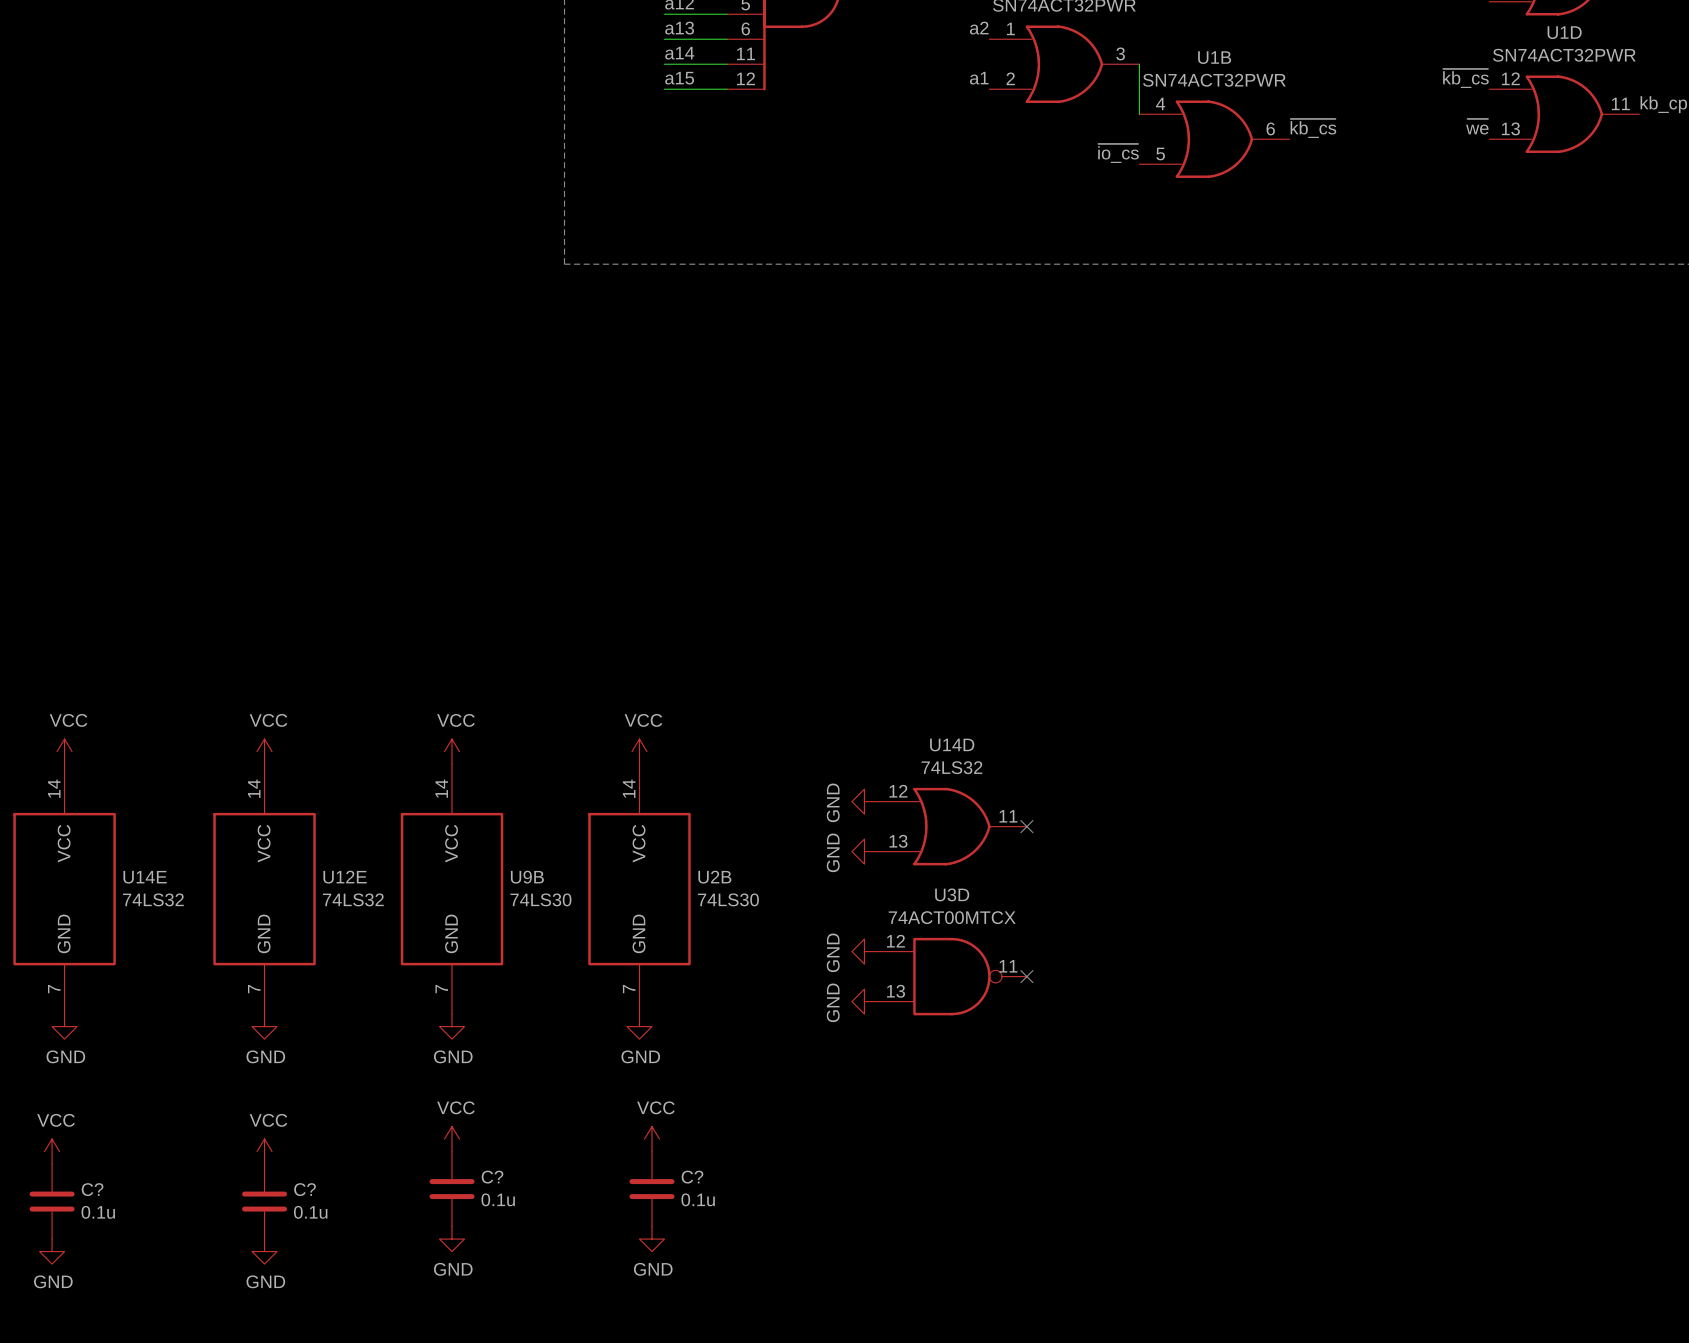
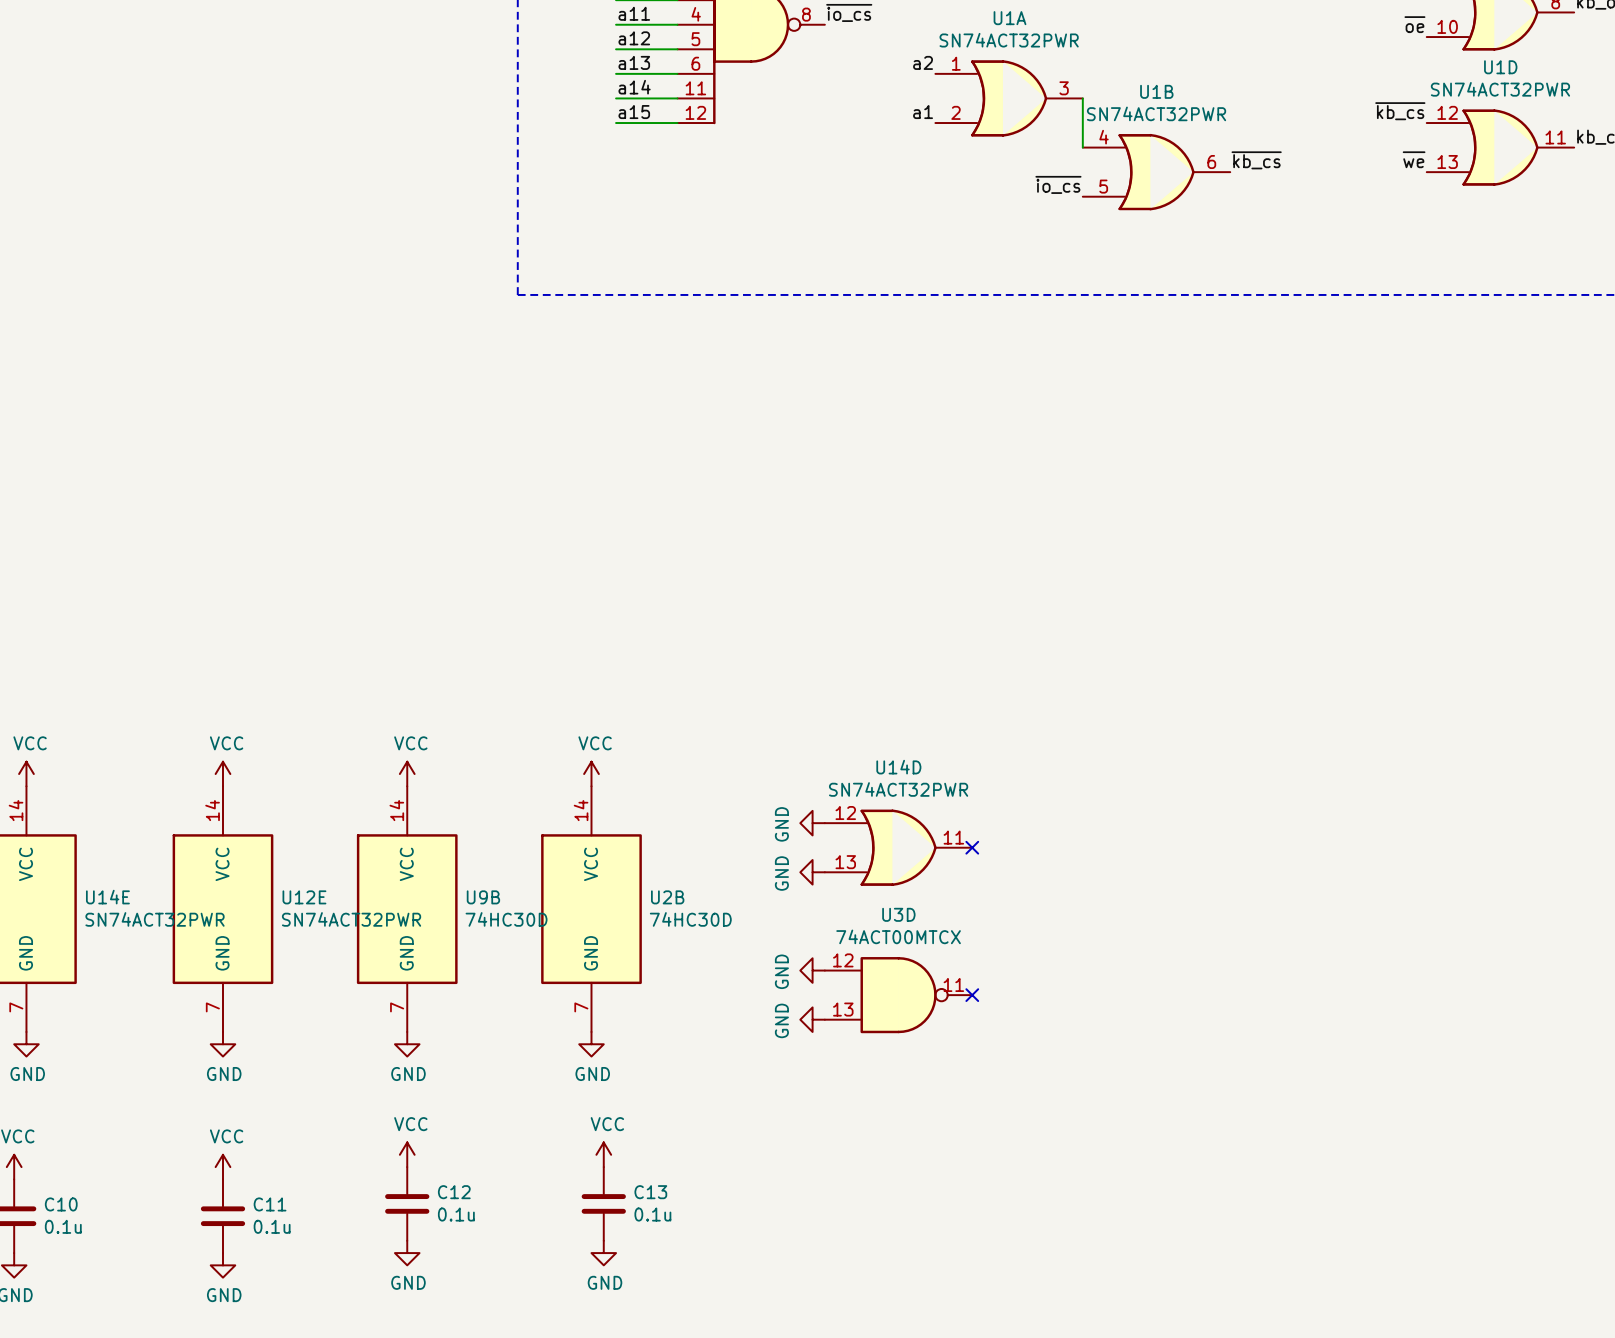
U14D value: 74LS32 (951, 767) -> SN74ACT32PWR (898, 789)
U14E value: 74LS32 (153, 899) -> SN74ACT32PWR (155, 919)
U12E value: 74LS32 (353, 899) -> SN74ACT32PWR (351, 919)
U9B value: 74LS30 (540, 899) -> 74HC30D (506, 919)
U2B value: 74LS30 (728, 899) -> 74HC30D (690, 919)
C? name: C? (492, 1177) -> C12 (454, 1192)
C? name: C? (692, 1177) -> C13 (650, 1192)
C? name: C? (92, 1189) -> C10 (61, 1204)
C? name: C? (305, 1189) -> C11 (270, 1204)

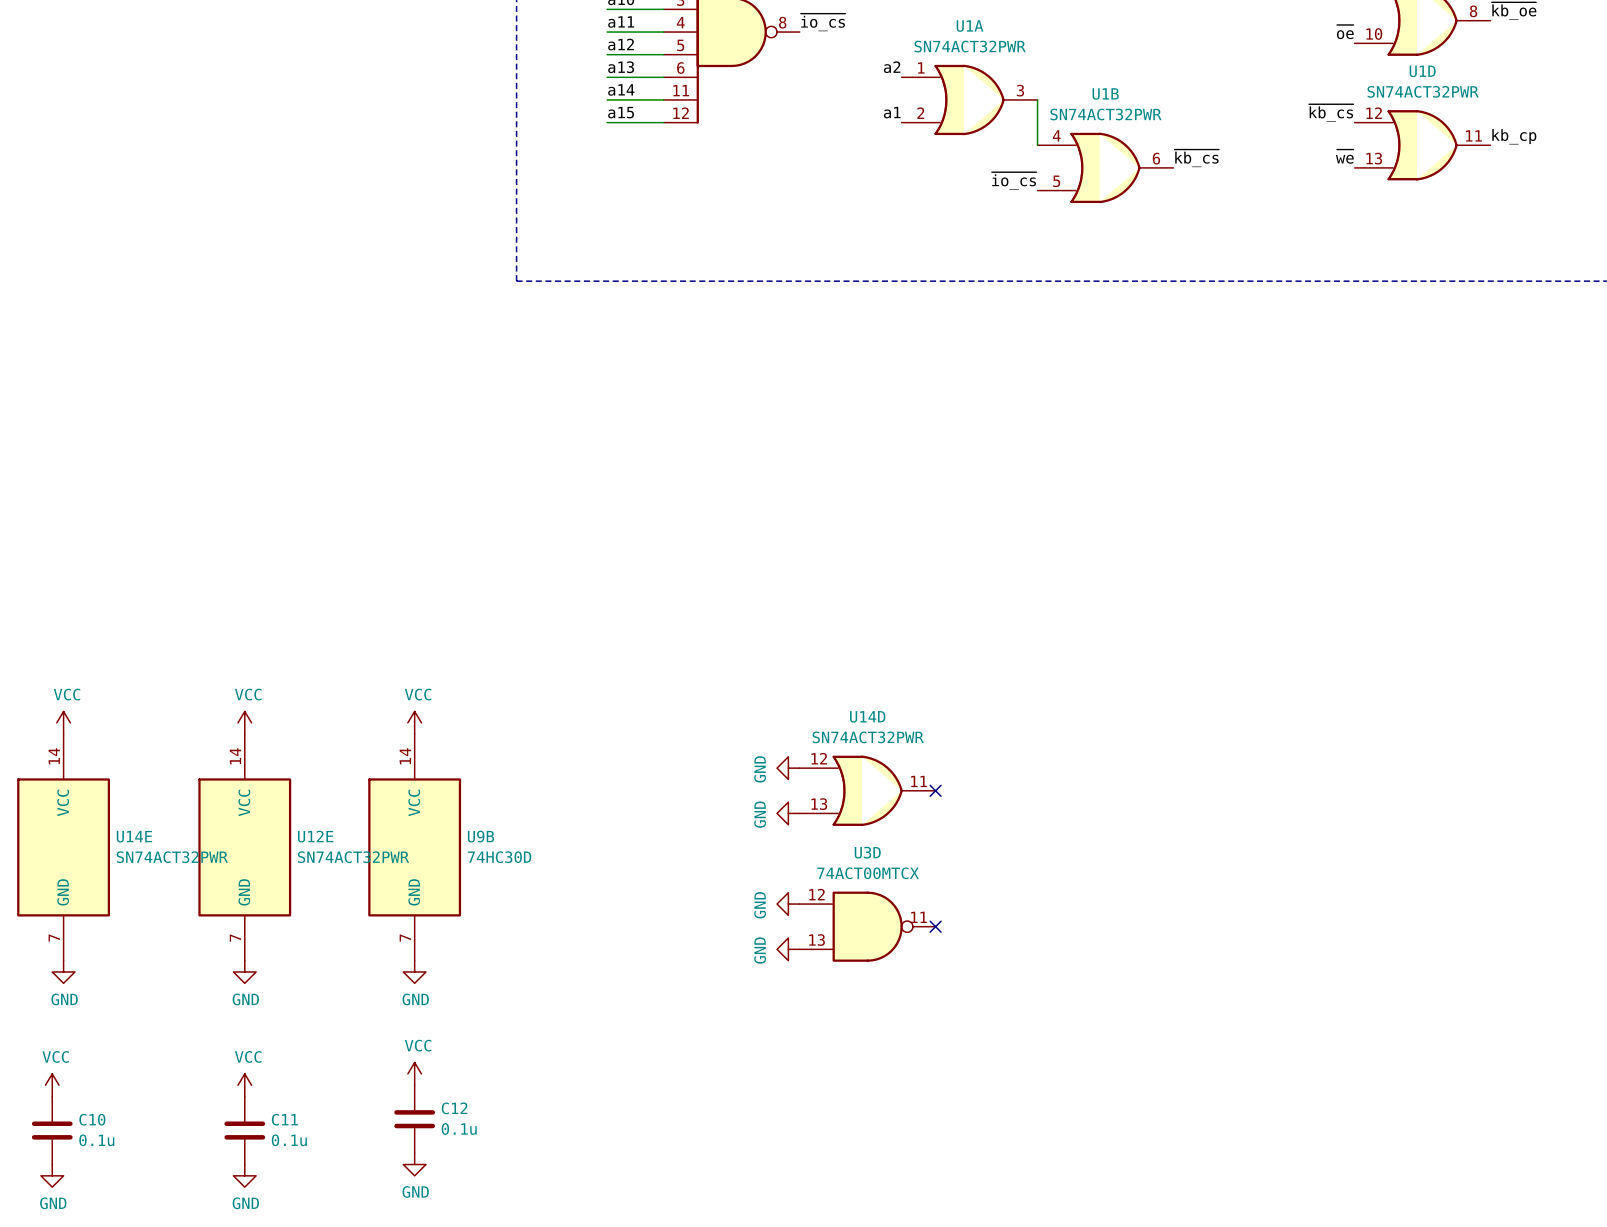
power symbol: VCC (591, 774) -> none
U2B: 74HC30D (591, 909) -> none
power symbol: GND (591, 1044) -> none
power symbol: VCC (603, 1154) -> none
C13: 0.1u (603, 1203) -> none
power symbol: GND (603, 1253) -> none

